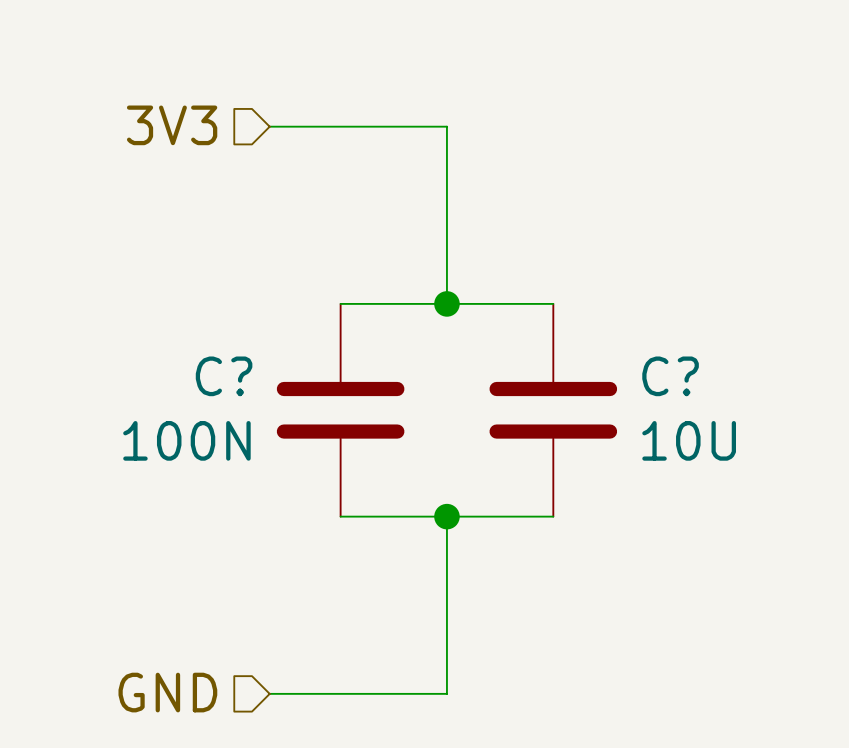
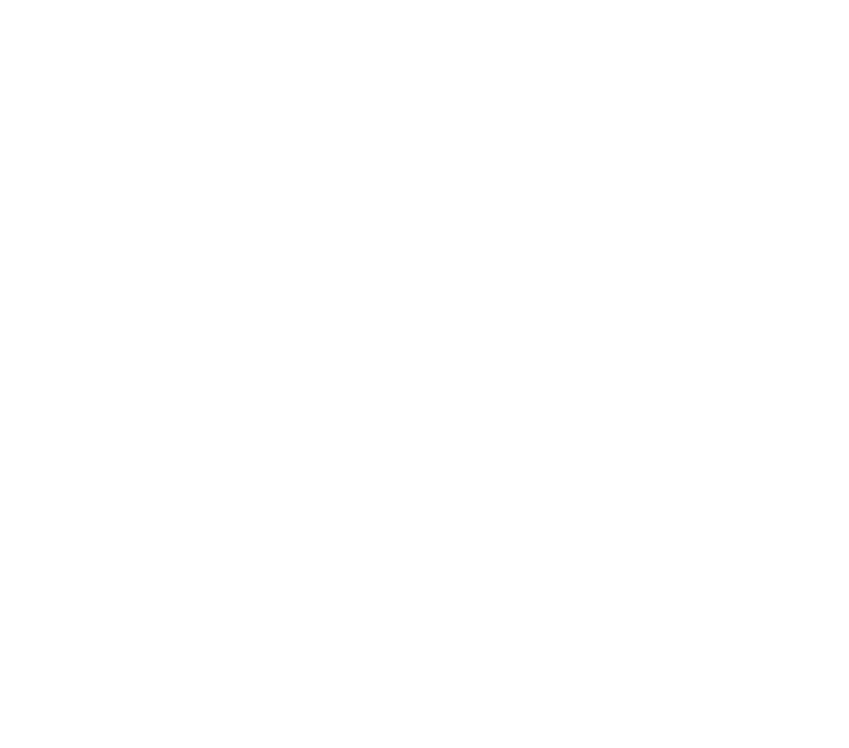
hierarchical label: 3V3 (172, 125) -> none
wire: (269, 126) (446, 126) (446, 303) -> none
wire: (340, 303) (553, 303) -> none
junction: (446, 303) -> none
C?: 100N (340, 410) -> none
C?: 10U (553, 410) -> none
wire: (340, 516) (553, 516) -> none
wire: (446, 516) (446, 693) (269, 693) -> none
junction: (446, 516) -> none
hierarchical label: GND (167, 692) -> none

